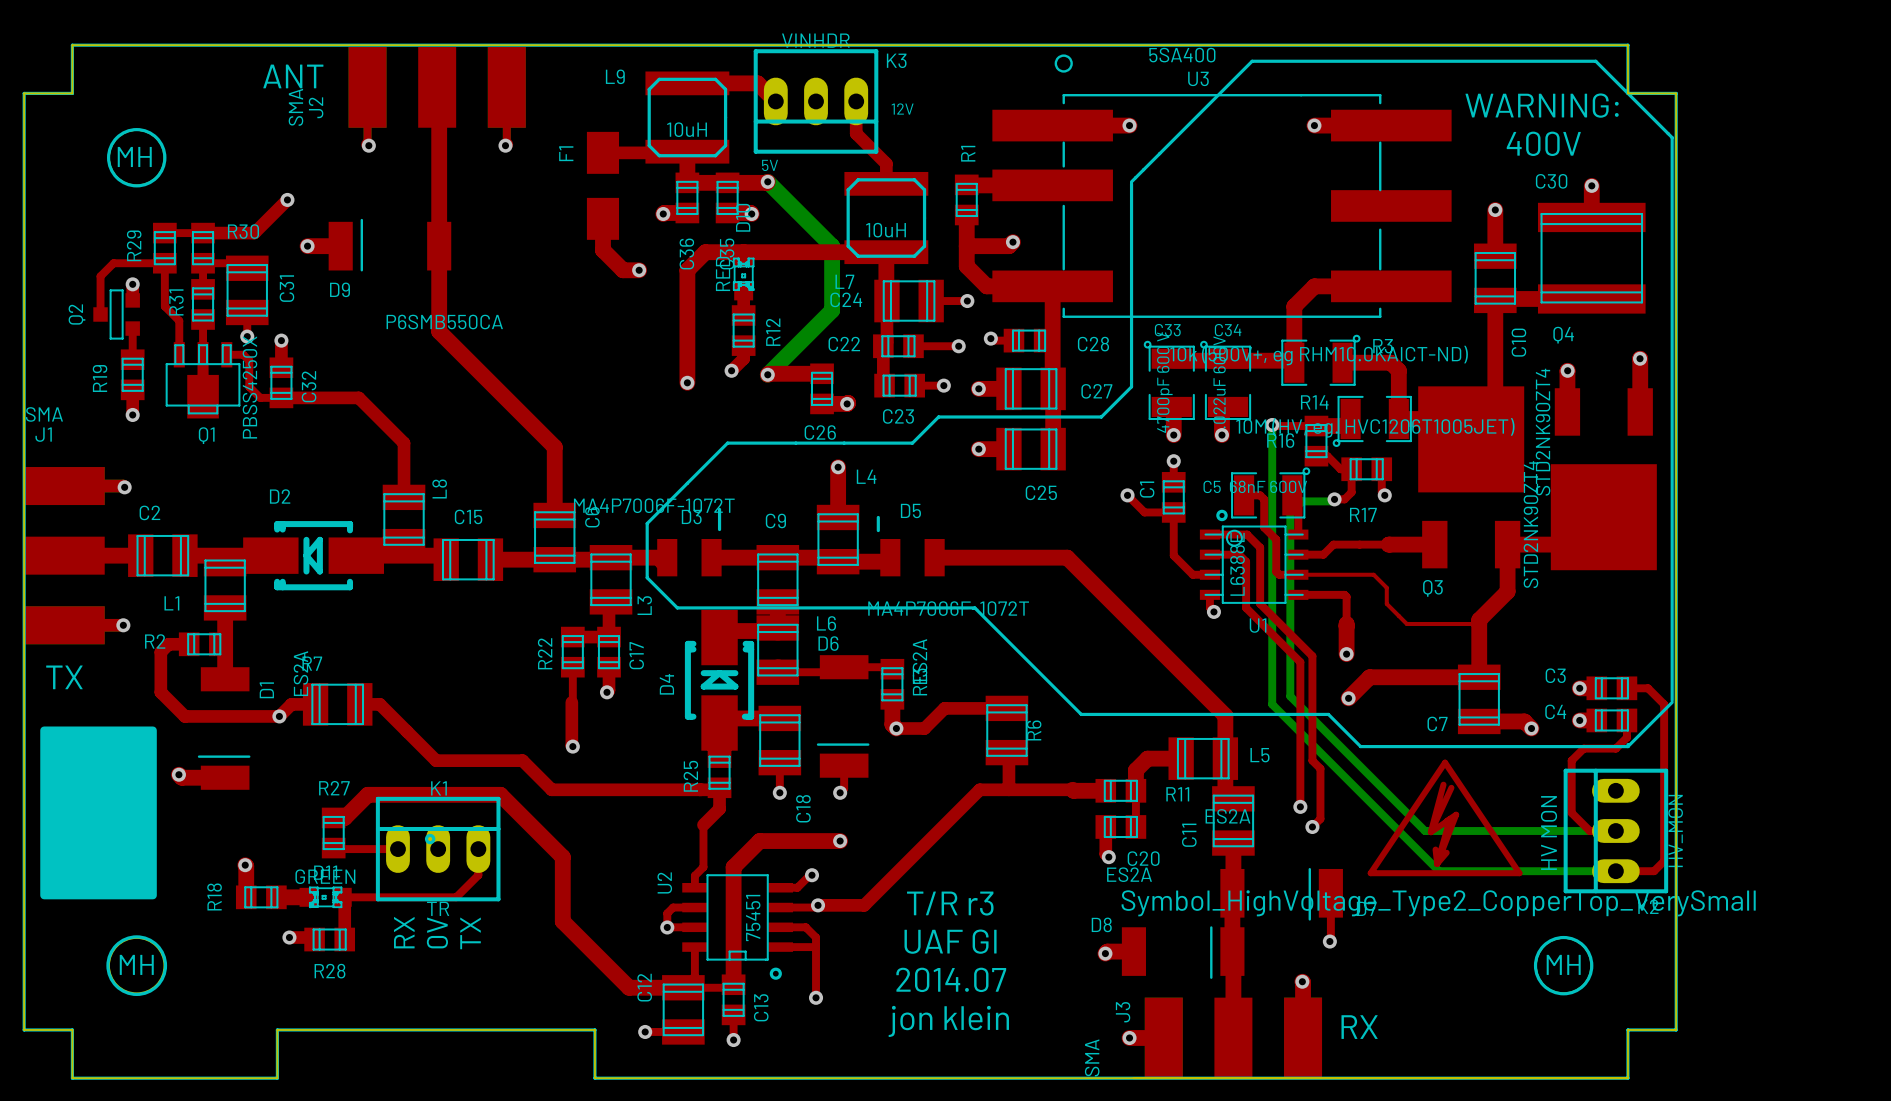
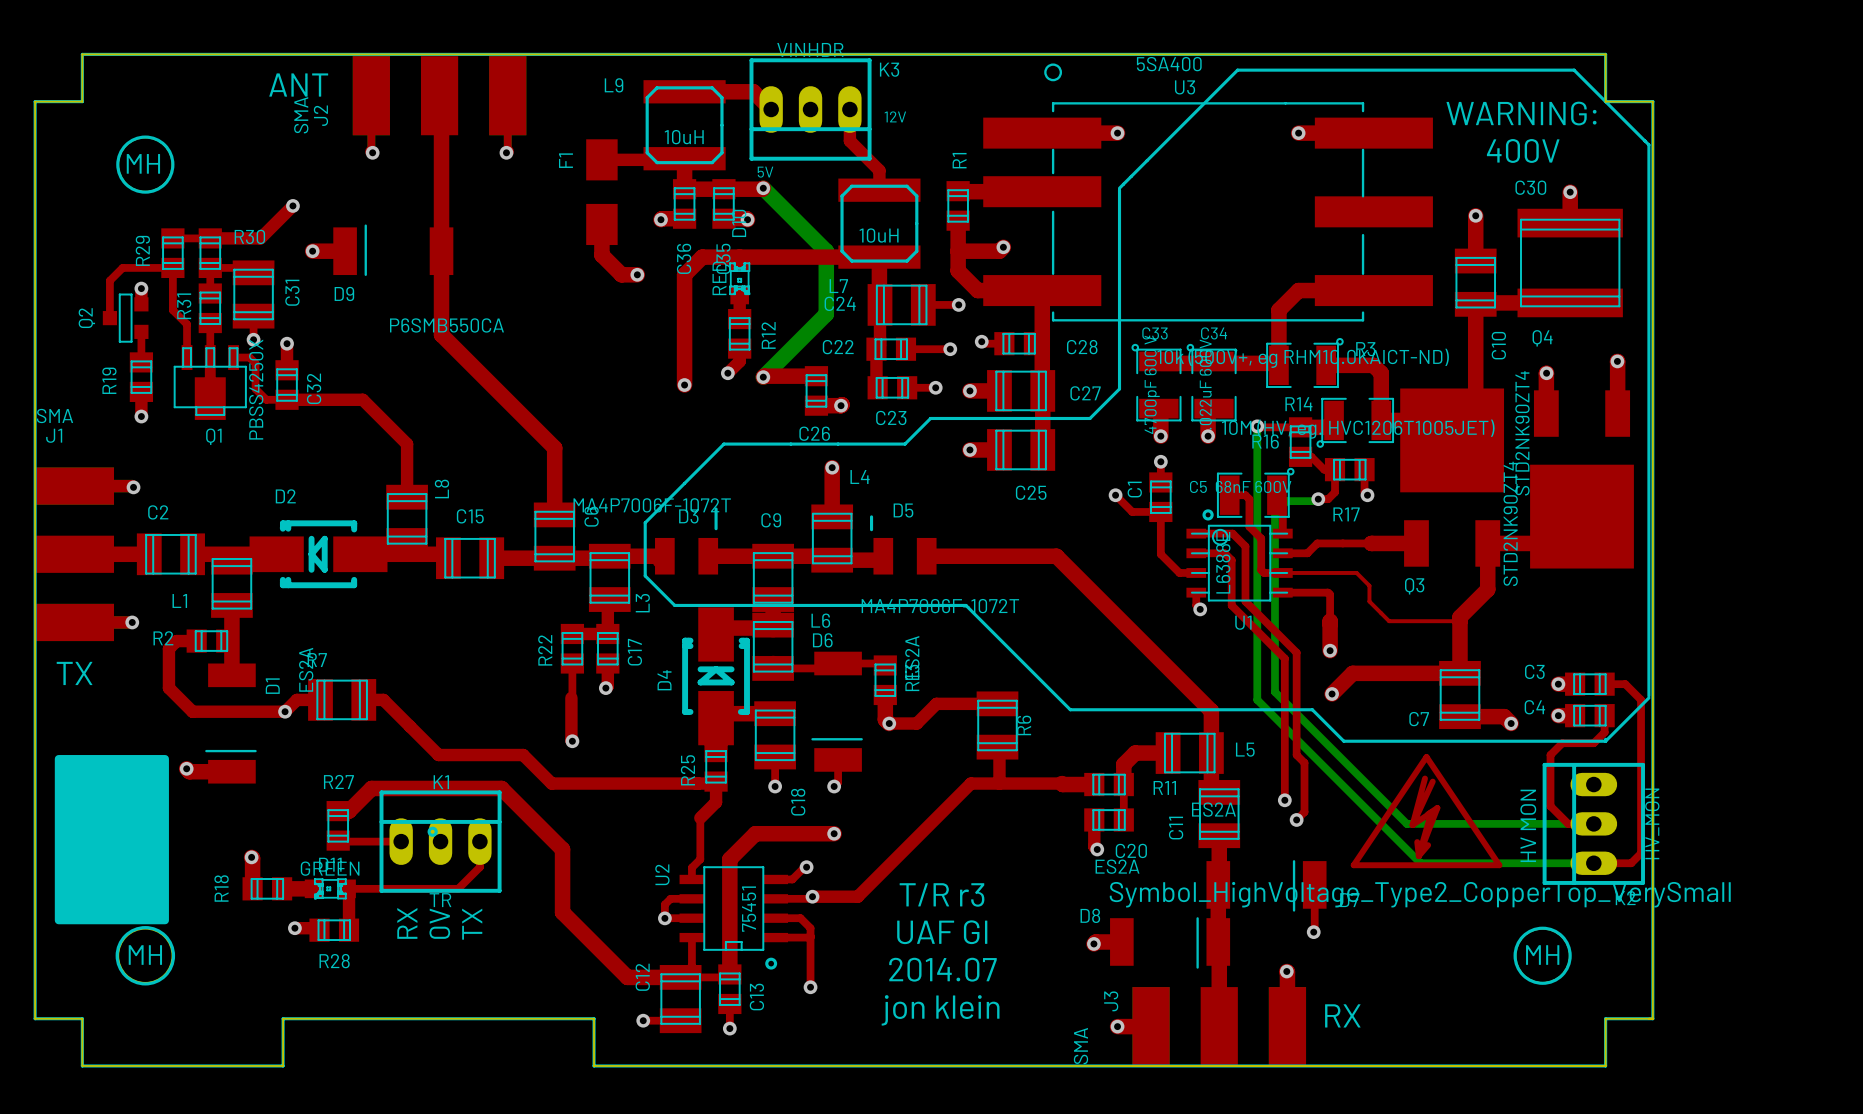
drawing position: (98, 812) -> (111, 839)

